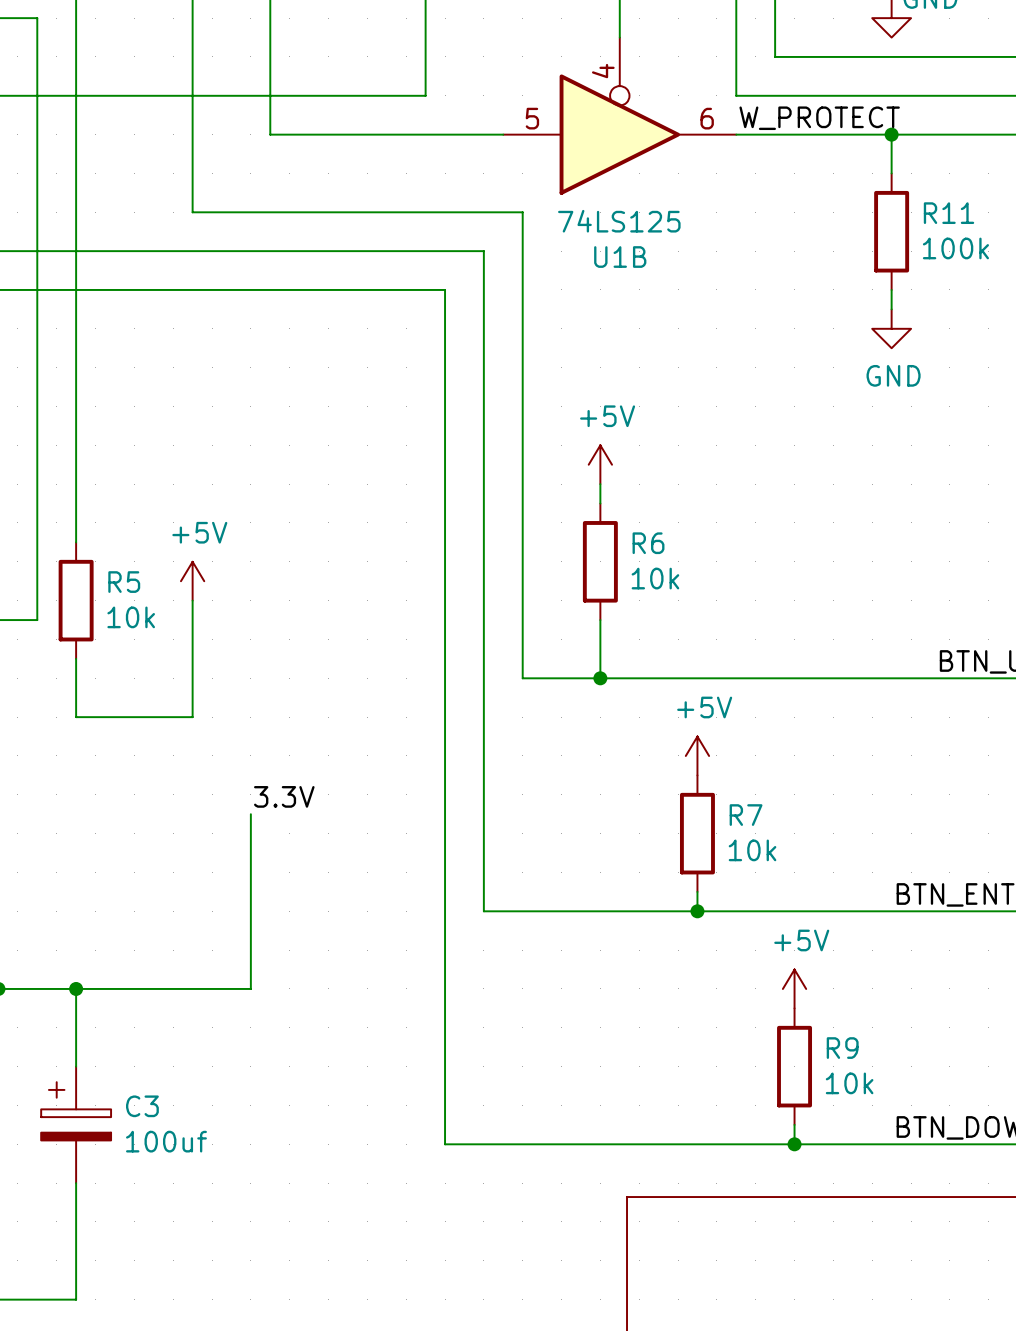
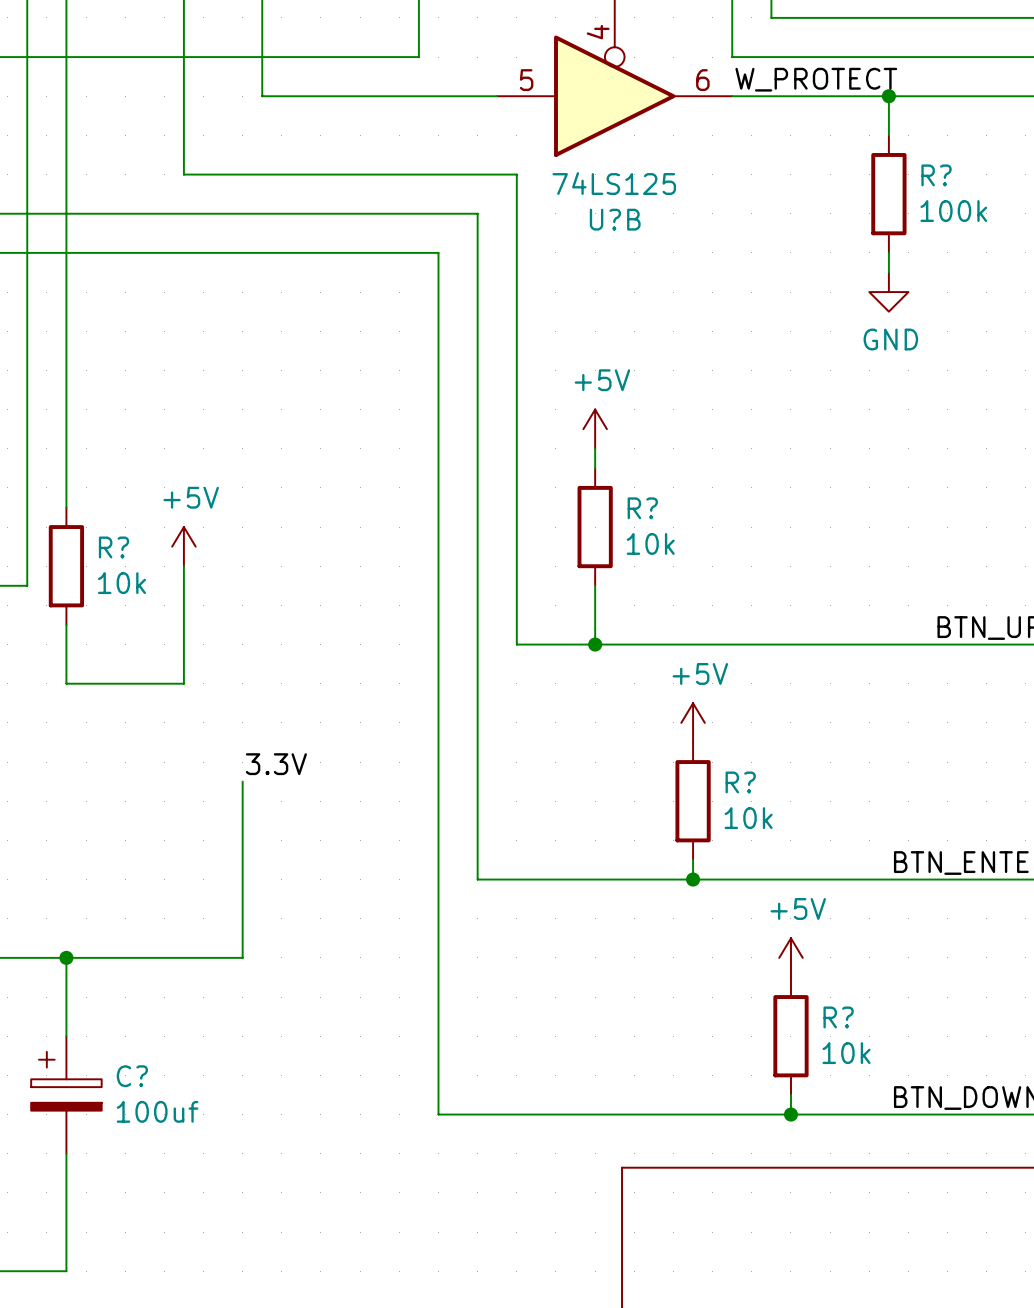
R11 name: R11 (949, 213) -> R? (936, 175)
U1B name: U1B (620, 257) -> U?B (615, 219)
R6 name: R6 (648, 543) -> R? (642, 508)
R5 name: R5 (124, 582) -> R? (114, 547)
R7 name: R7 (746, 815) -> R? (740, 782)
R9 name: R9 (842, 1048) -> R? (838, 1017)
C3 name: C3 (142, 1106) -> C? (132, 1076)

